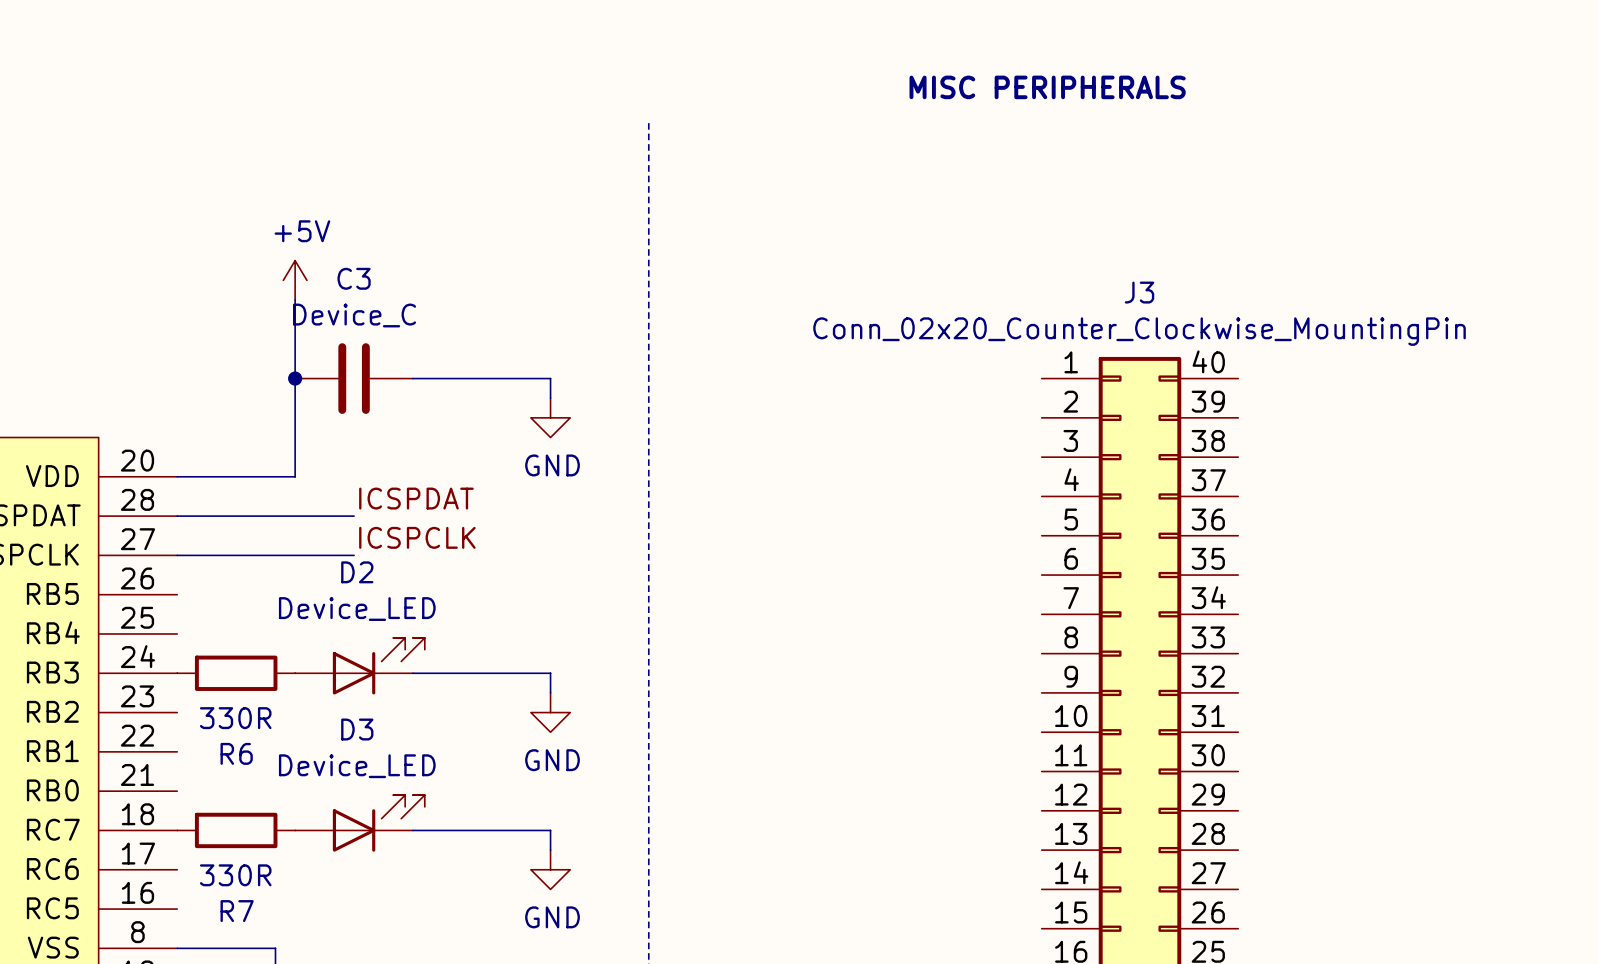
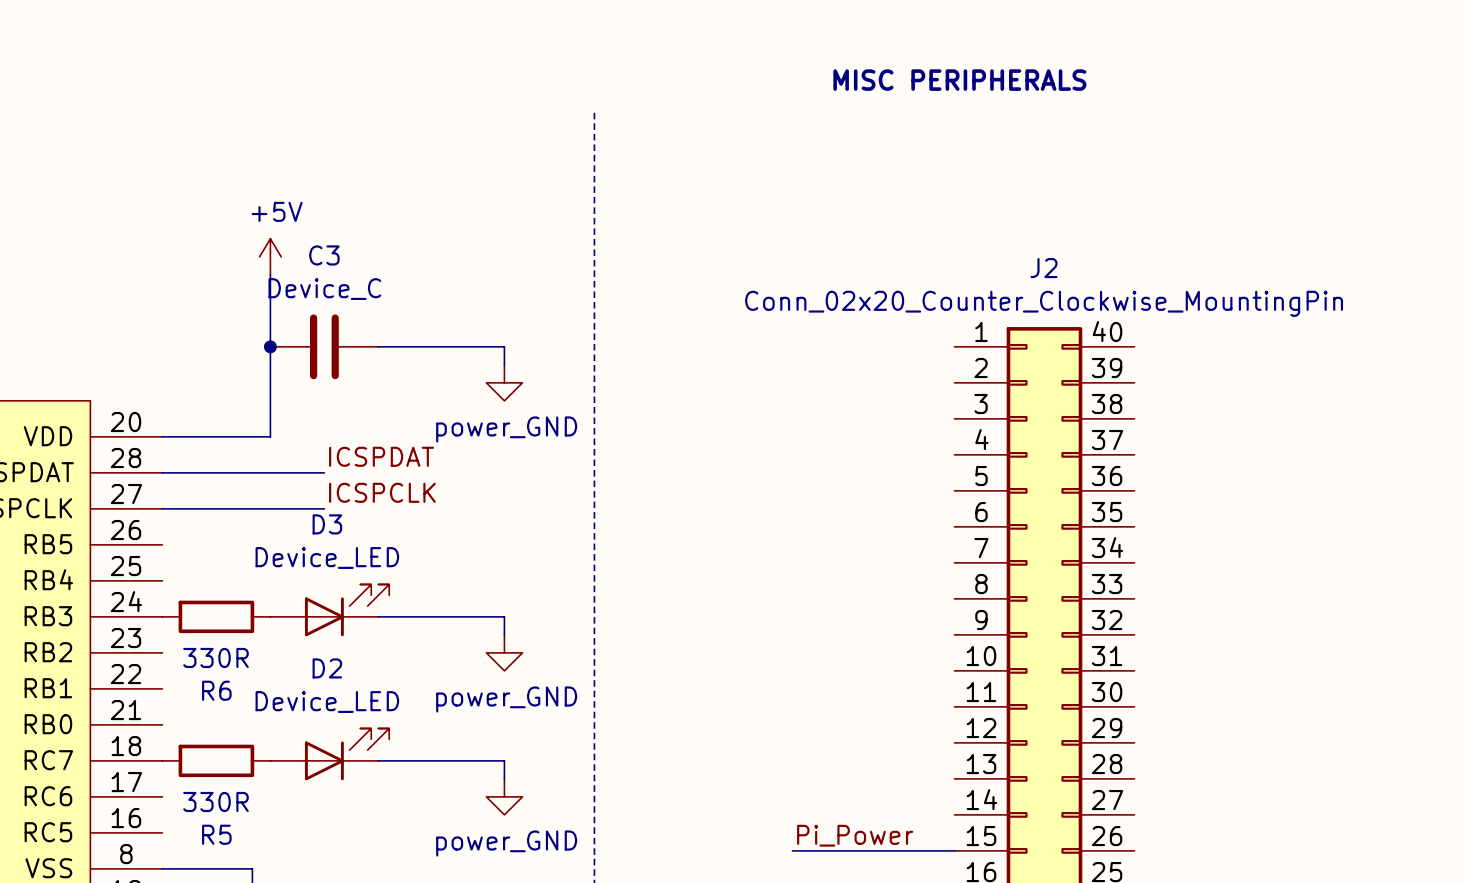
J3 name: J3 (1139, 292) -> J2 (1044, 268)
power symbol: GND (550, 417) -> power_GND (504, 382)
D2 name: D2 (357, 572) -> D3 (327, 524)
power symbol: GND (550, 712) -> power_GND (504, 652)
D3 name: D3 (357, 729) -> D2 (327, 668)
power symbol: GND (550, 869) -> power_GND (504, 796)
R7 name: R7 (237, 911) -> R5 (216, 834)
label: none -> Pi_Power (855, 835)
wire: none -> (792, 850) (954, 850)

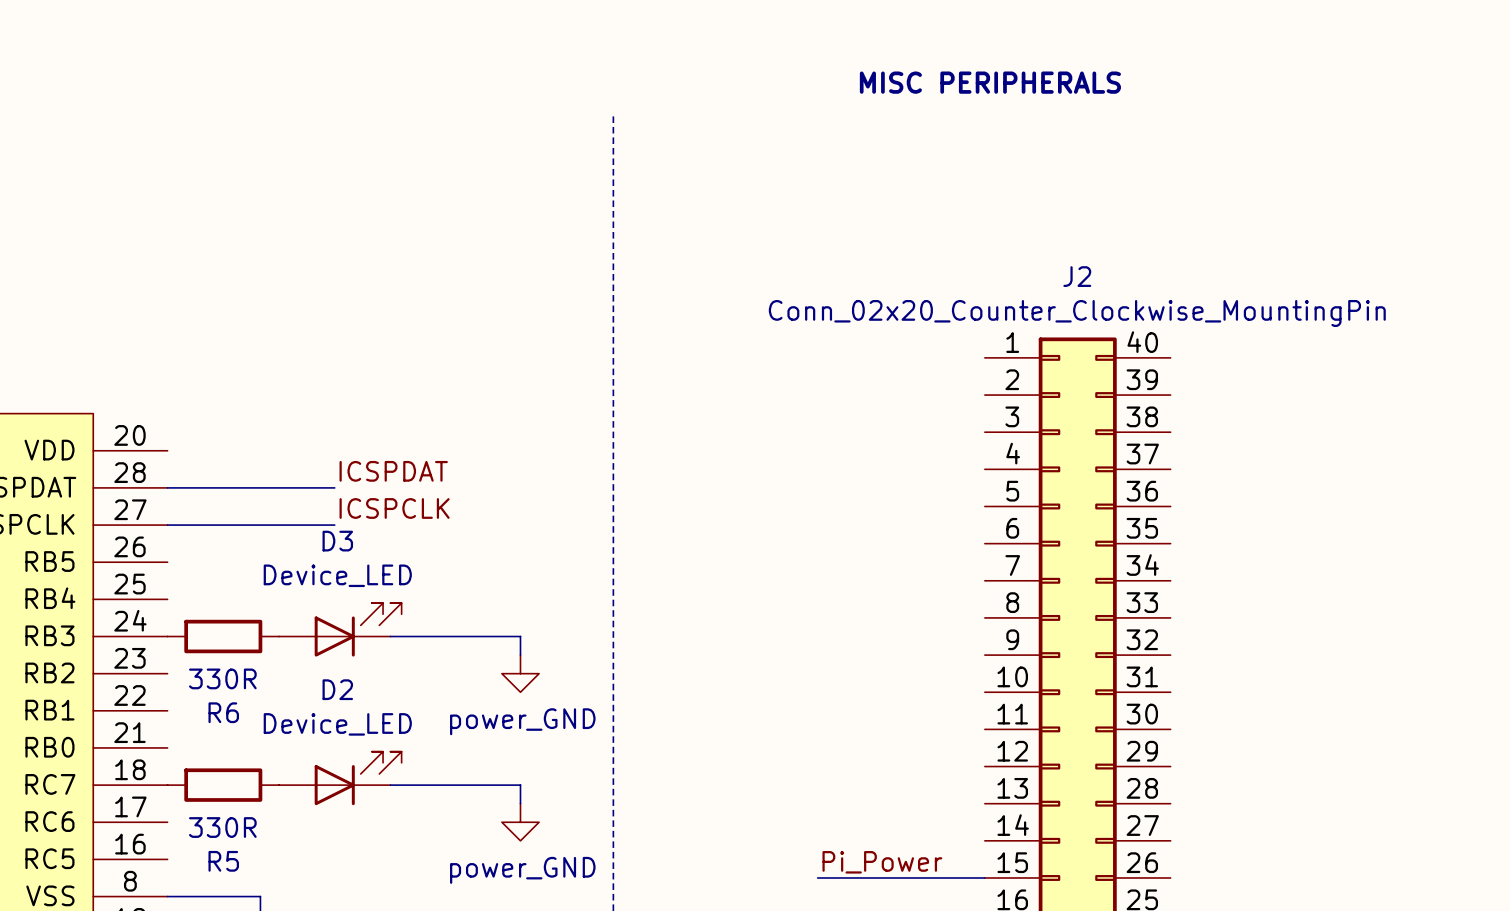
power symbol: +5V (270, 256) -> none
wire: (270, 274) (270, 436) (162, 436) -> none
junction: (270, 346) -> none
C3: Device_C (324, 346) -> none
wire: (378, 346) (504, 346) (504, 364) -> none
power symbol: power_GND (504, 382) -> none

